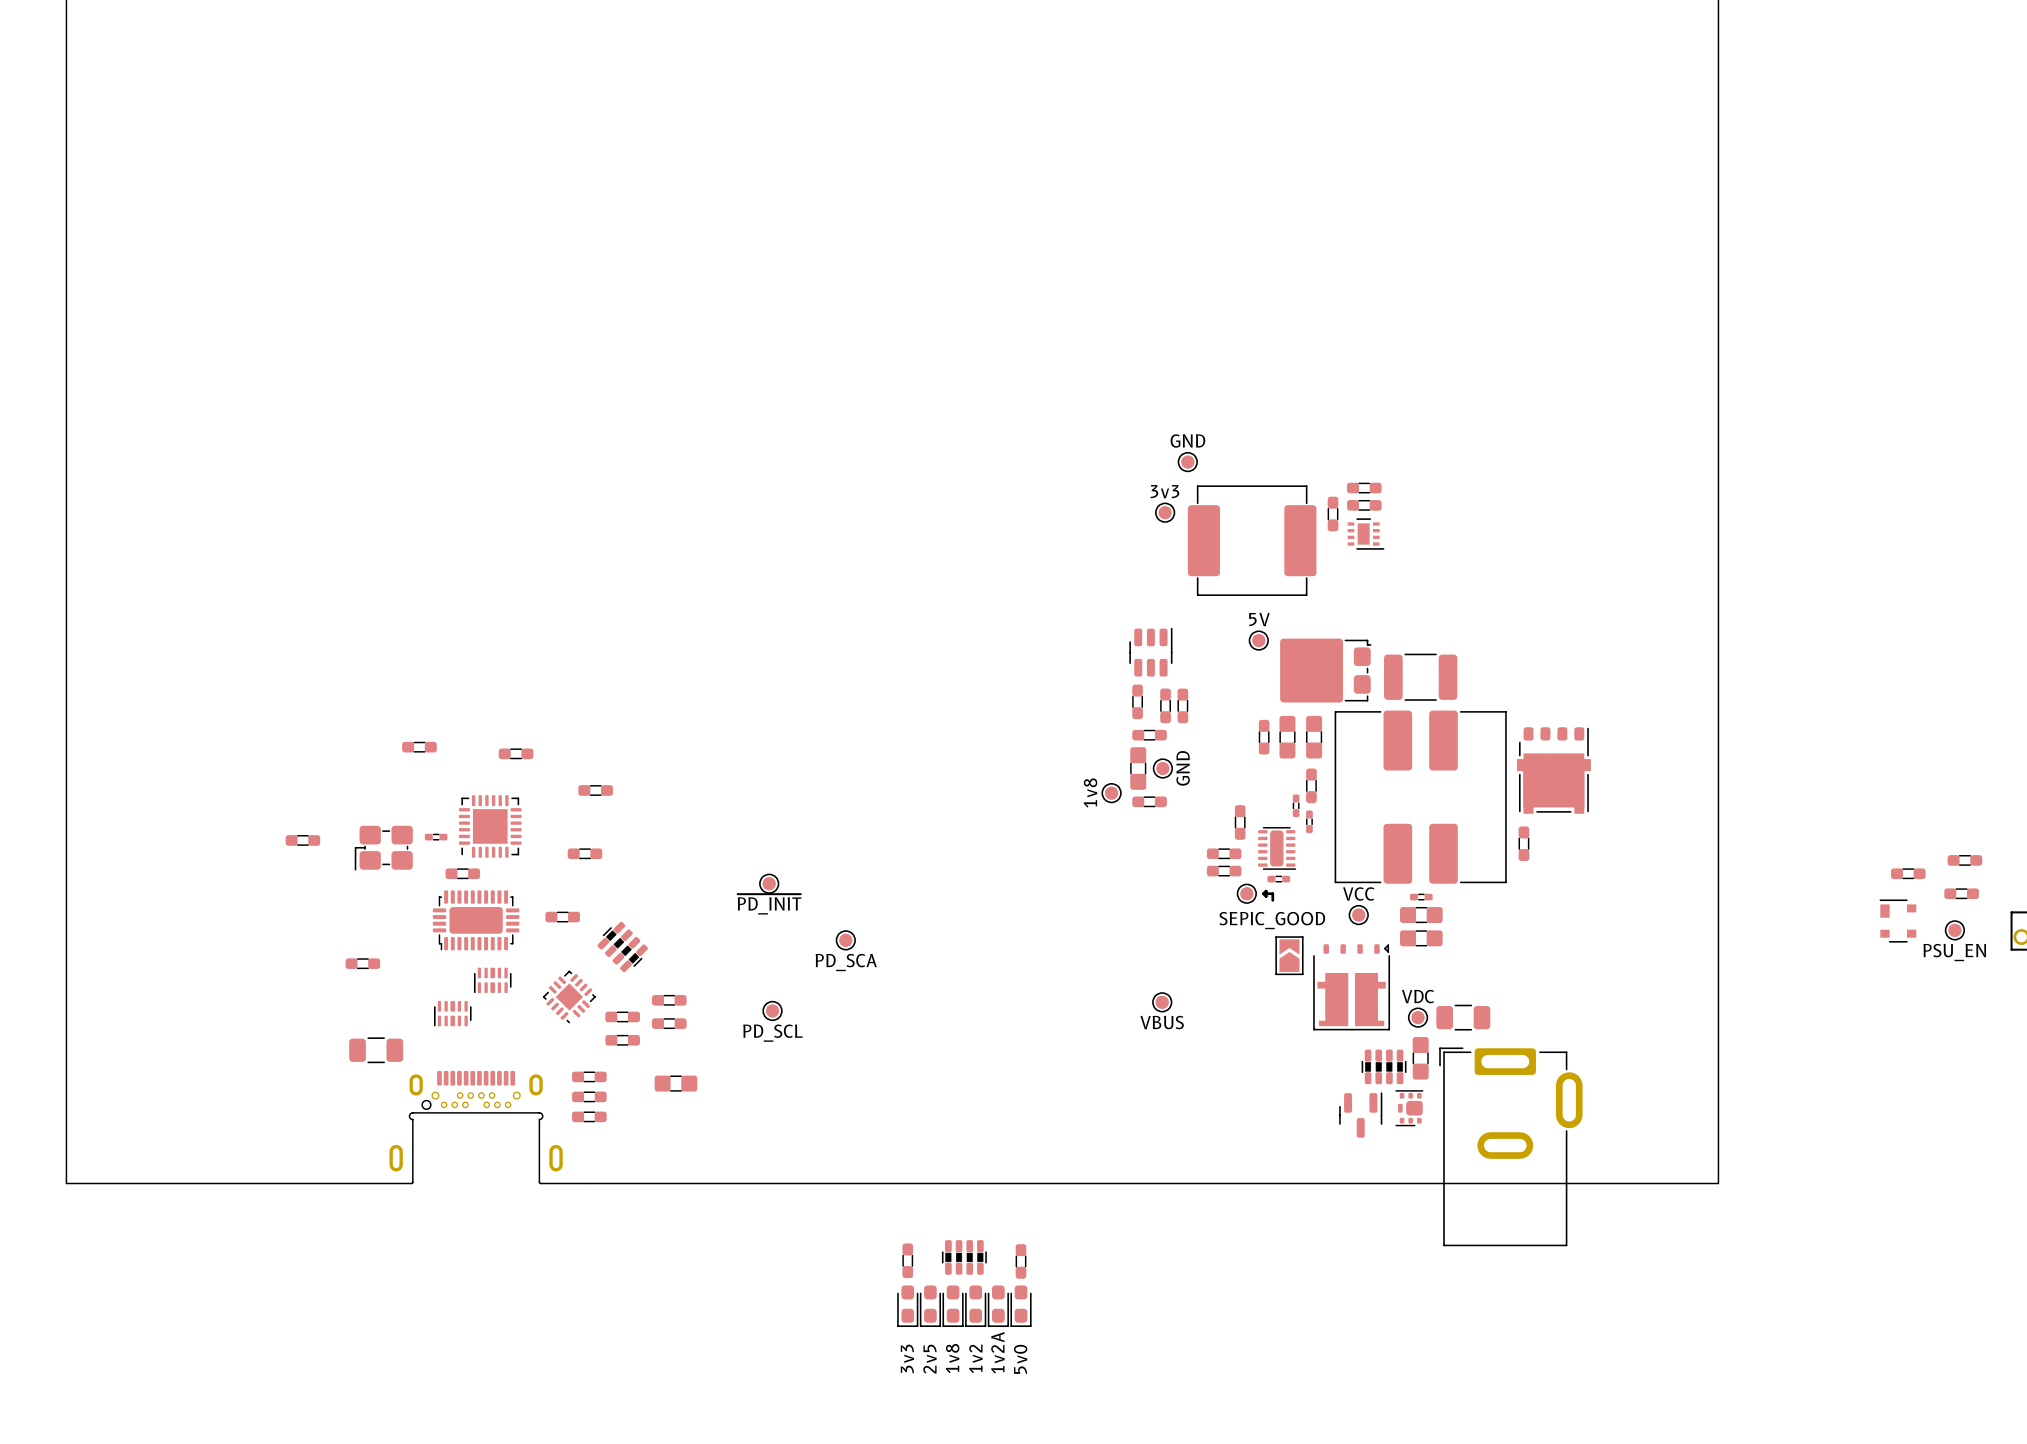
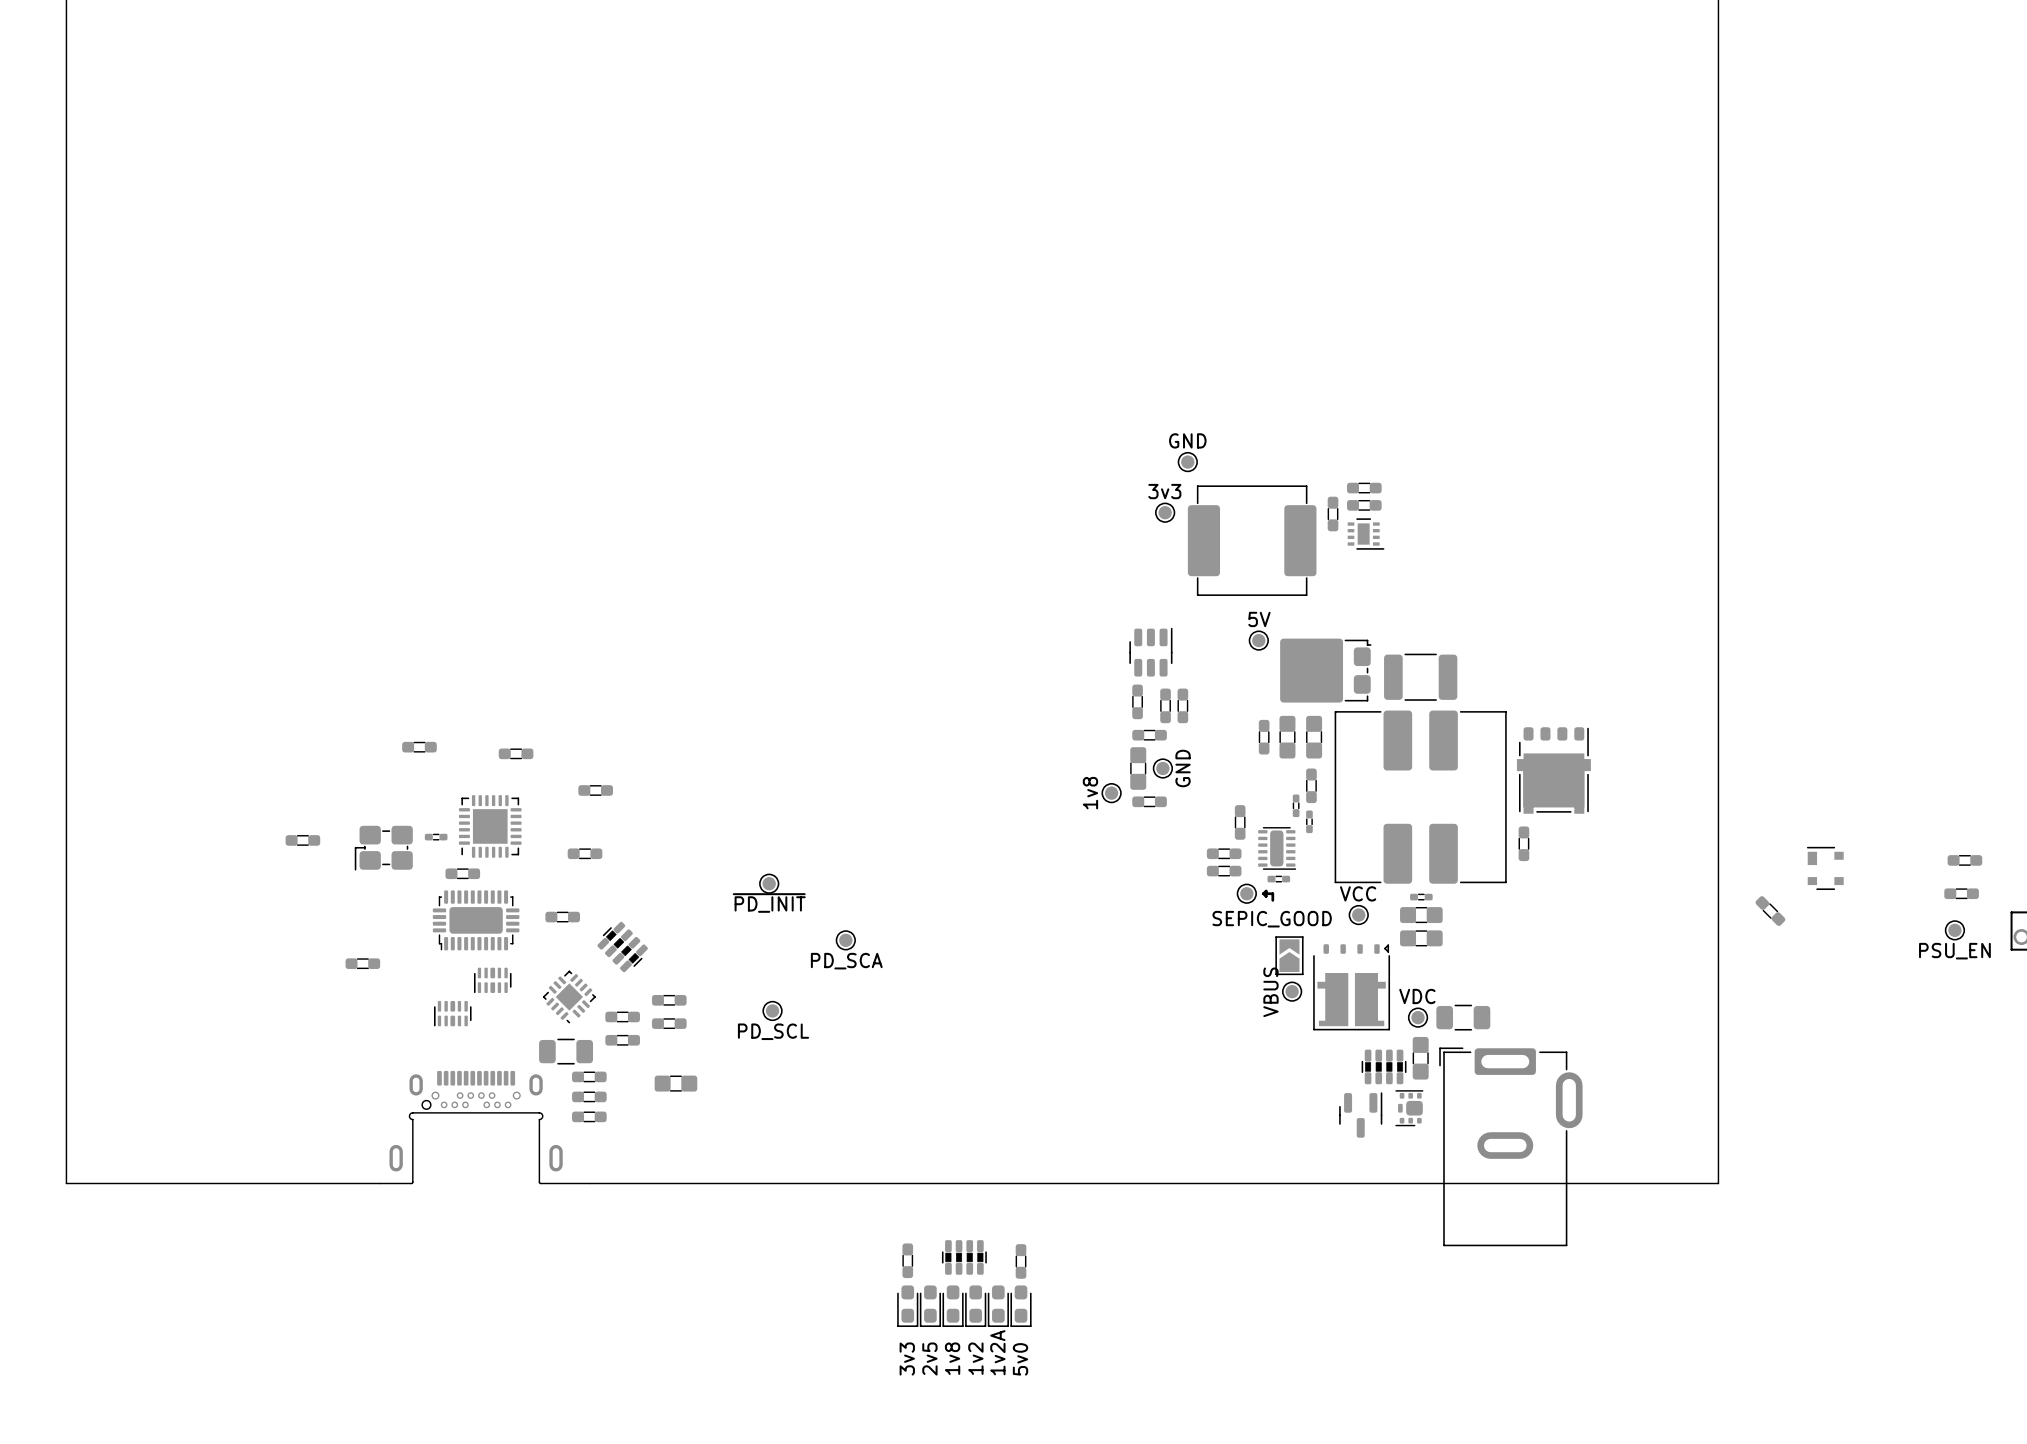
part: (1908, 873) -> none
part: none -> (1770, 911)
part position: (1897, 921) -> (1825, 868)
part position: (1162, 1002) -> (1292, 991)
part value rotation: 0° (1162, 1022) -> 90° counterclockwise (1270, 992)
part position: (376, 1050) -> (566, 1051)

